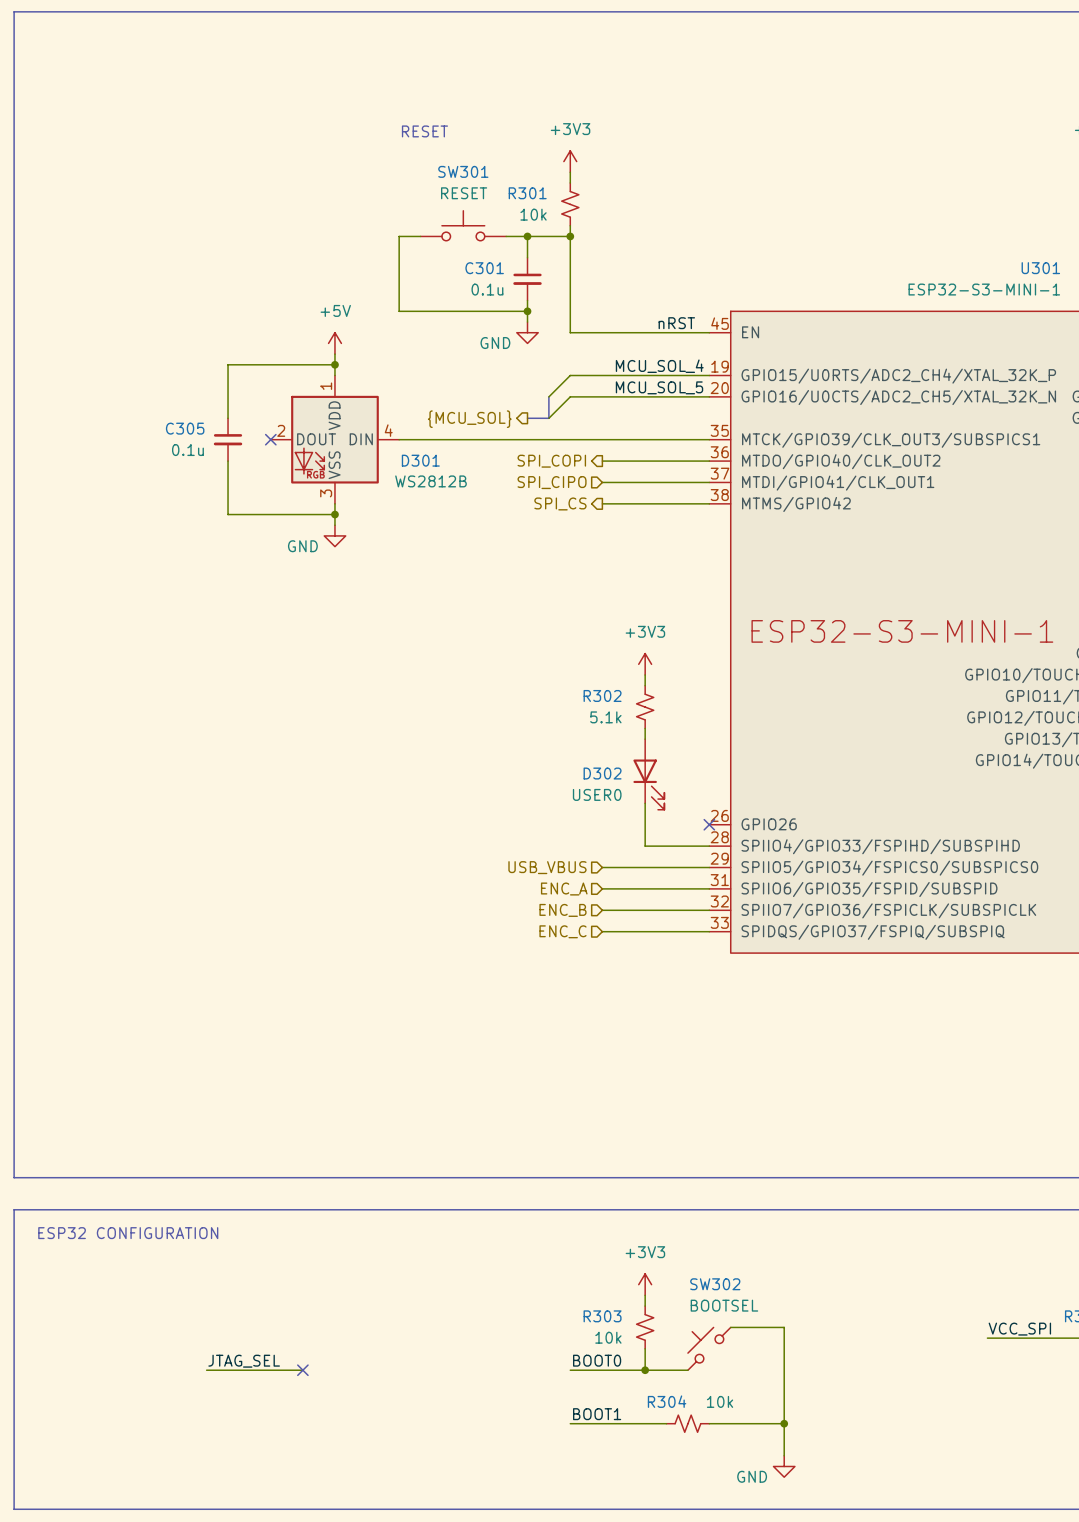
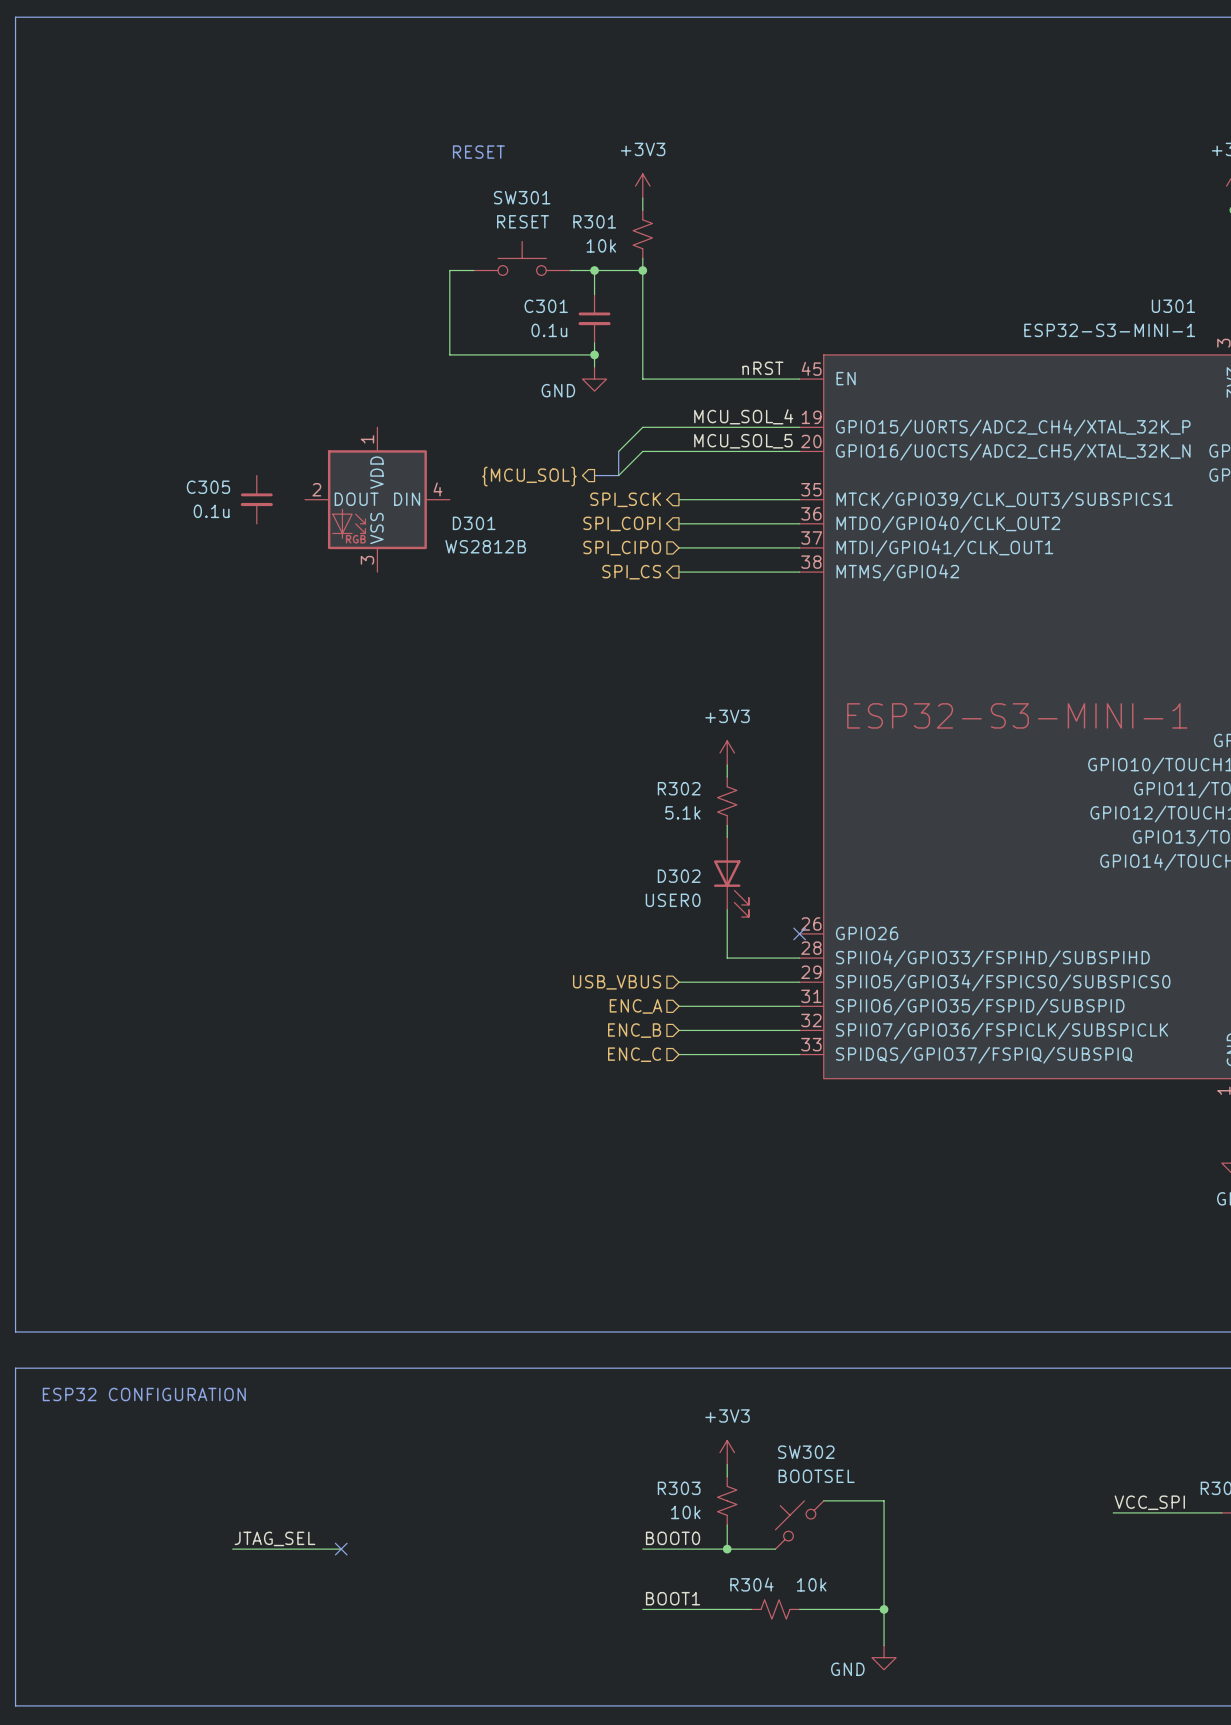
power symbol: +5V (334, 343) -> none
wire: (334, 354) (334, 375) -> none
wire: (334, 364) (228, 364) (228, 418) -> none
junction: (334, 364) -> none
no-connect mark: (270, 439) -> none
wire: (399, 439) (602, 439) -> none
hierarchical label: none -> SPI_SCK (625, 499)
wire: (228, 461) (228, 514) (334, 514) -> none
wire: (334, 503) (334, 525) -> none
junction: (334, 514) -> none
power symbol: GND (334, 535) -> none

